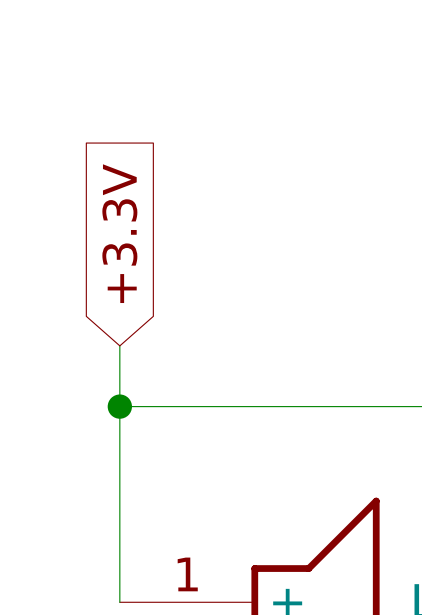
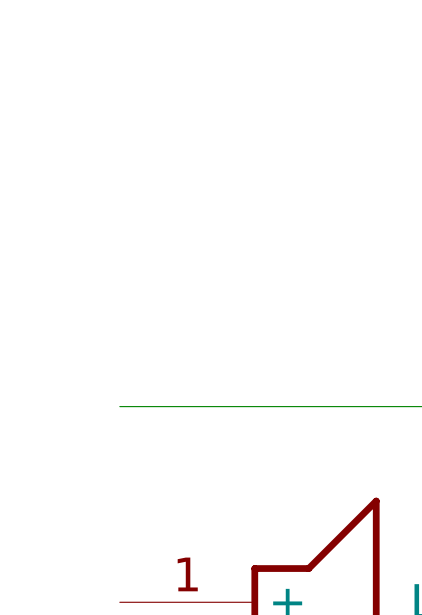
global label: +3.3V (119, 233) -> none
wire: (119, 345) (119, 602) -> none
junction: (119, 406) -> none

